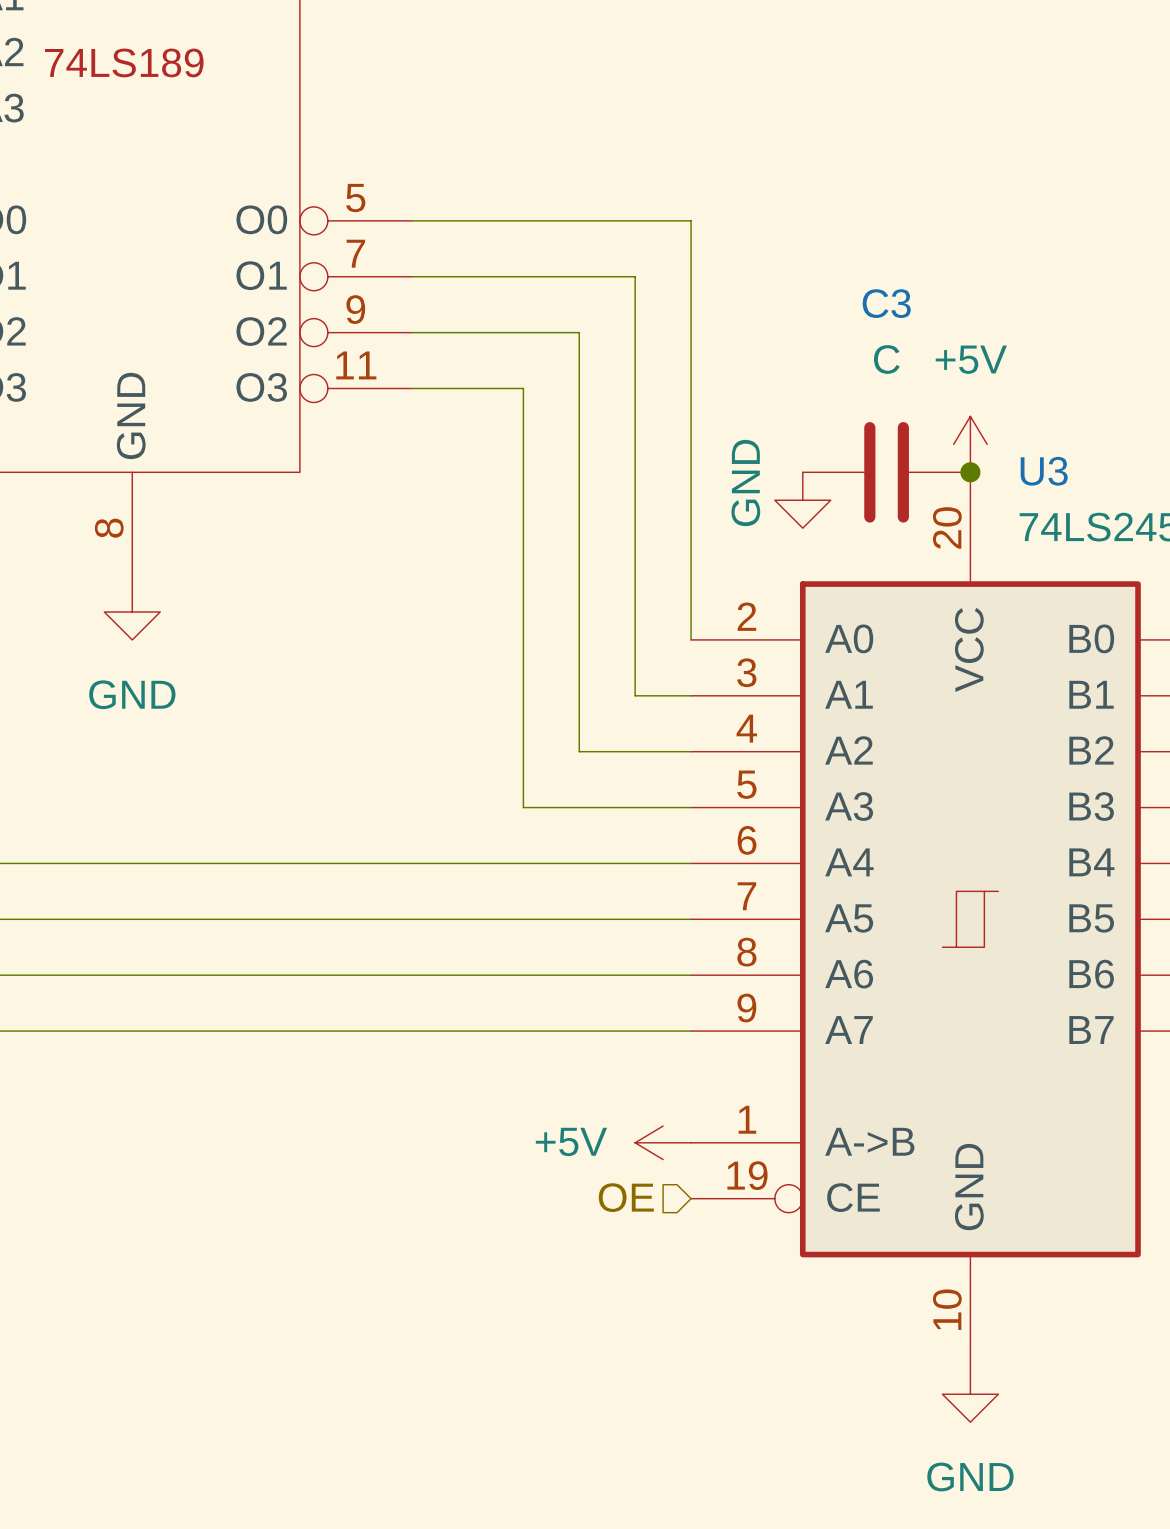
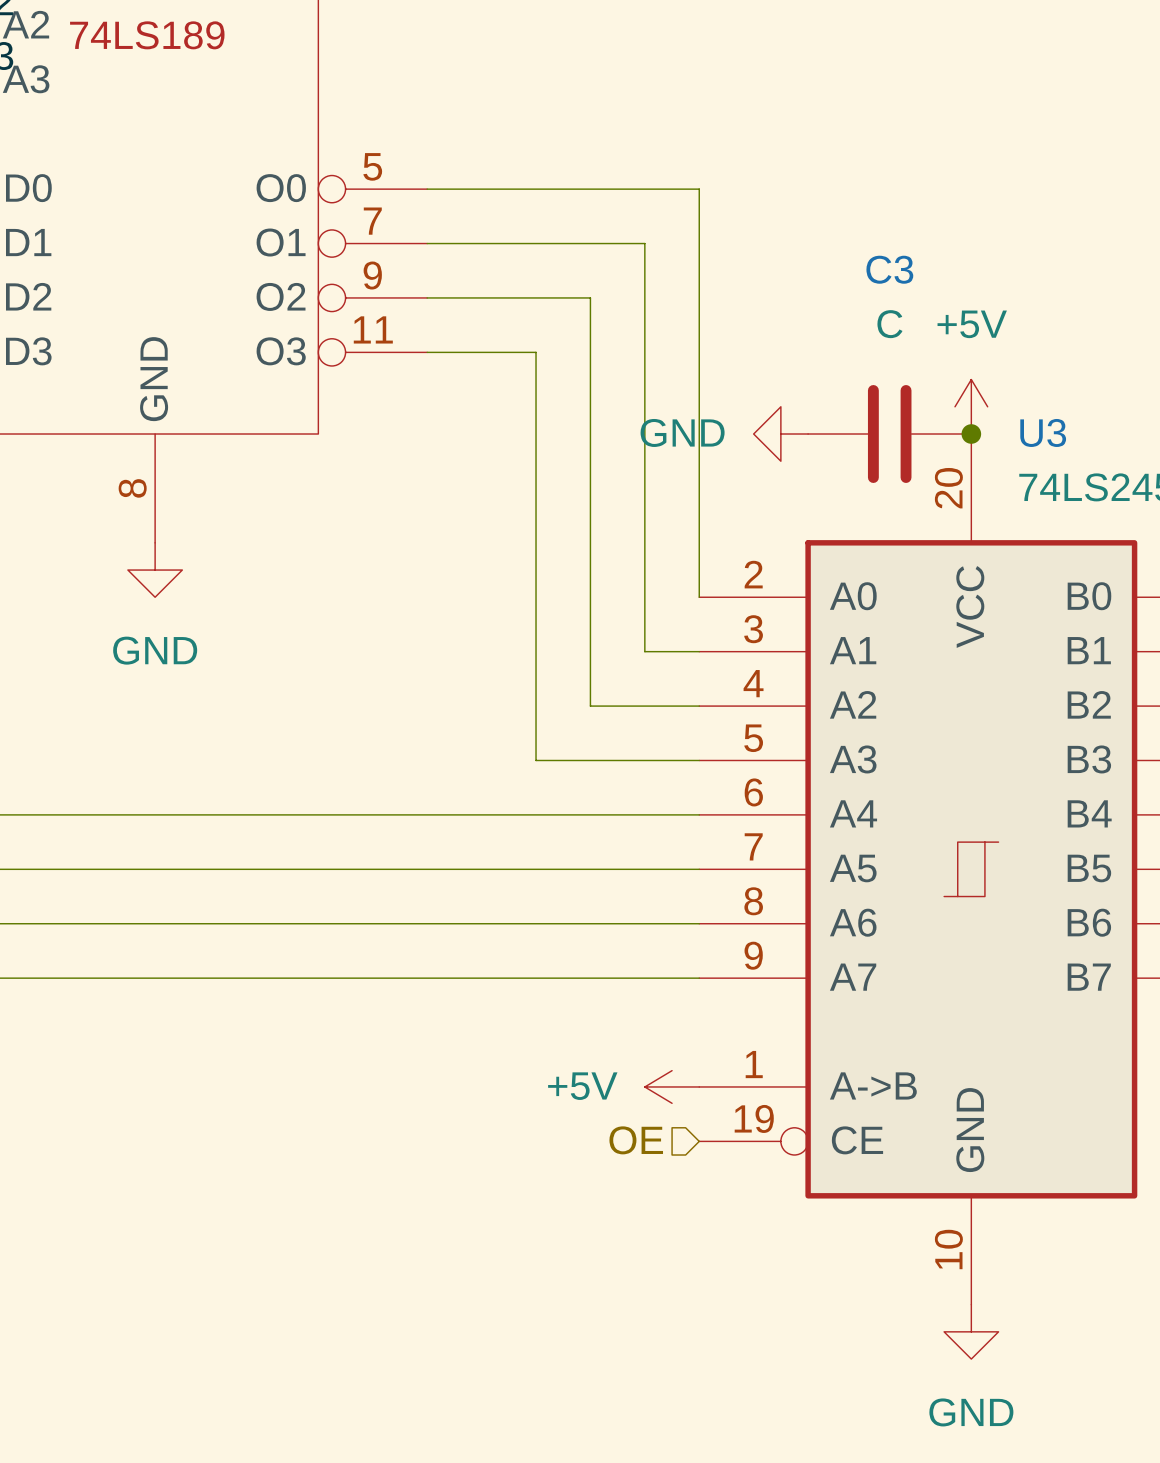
power symbol text position: GND (745, 483) -> GND (682, 432)
power symbol rotation: 0° (802, 500) -> 90° clockwise (780, 434)
power symbol position: GND (802, 500) -> GND (780, 434)

